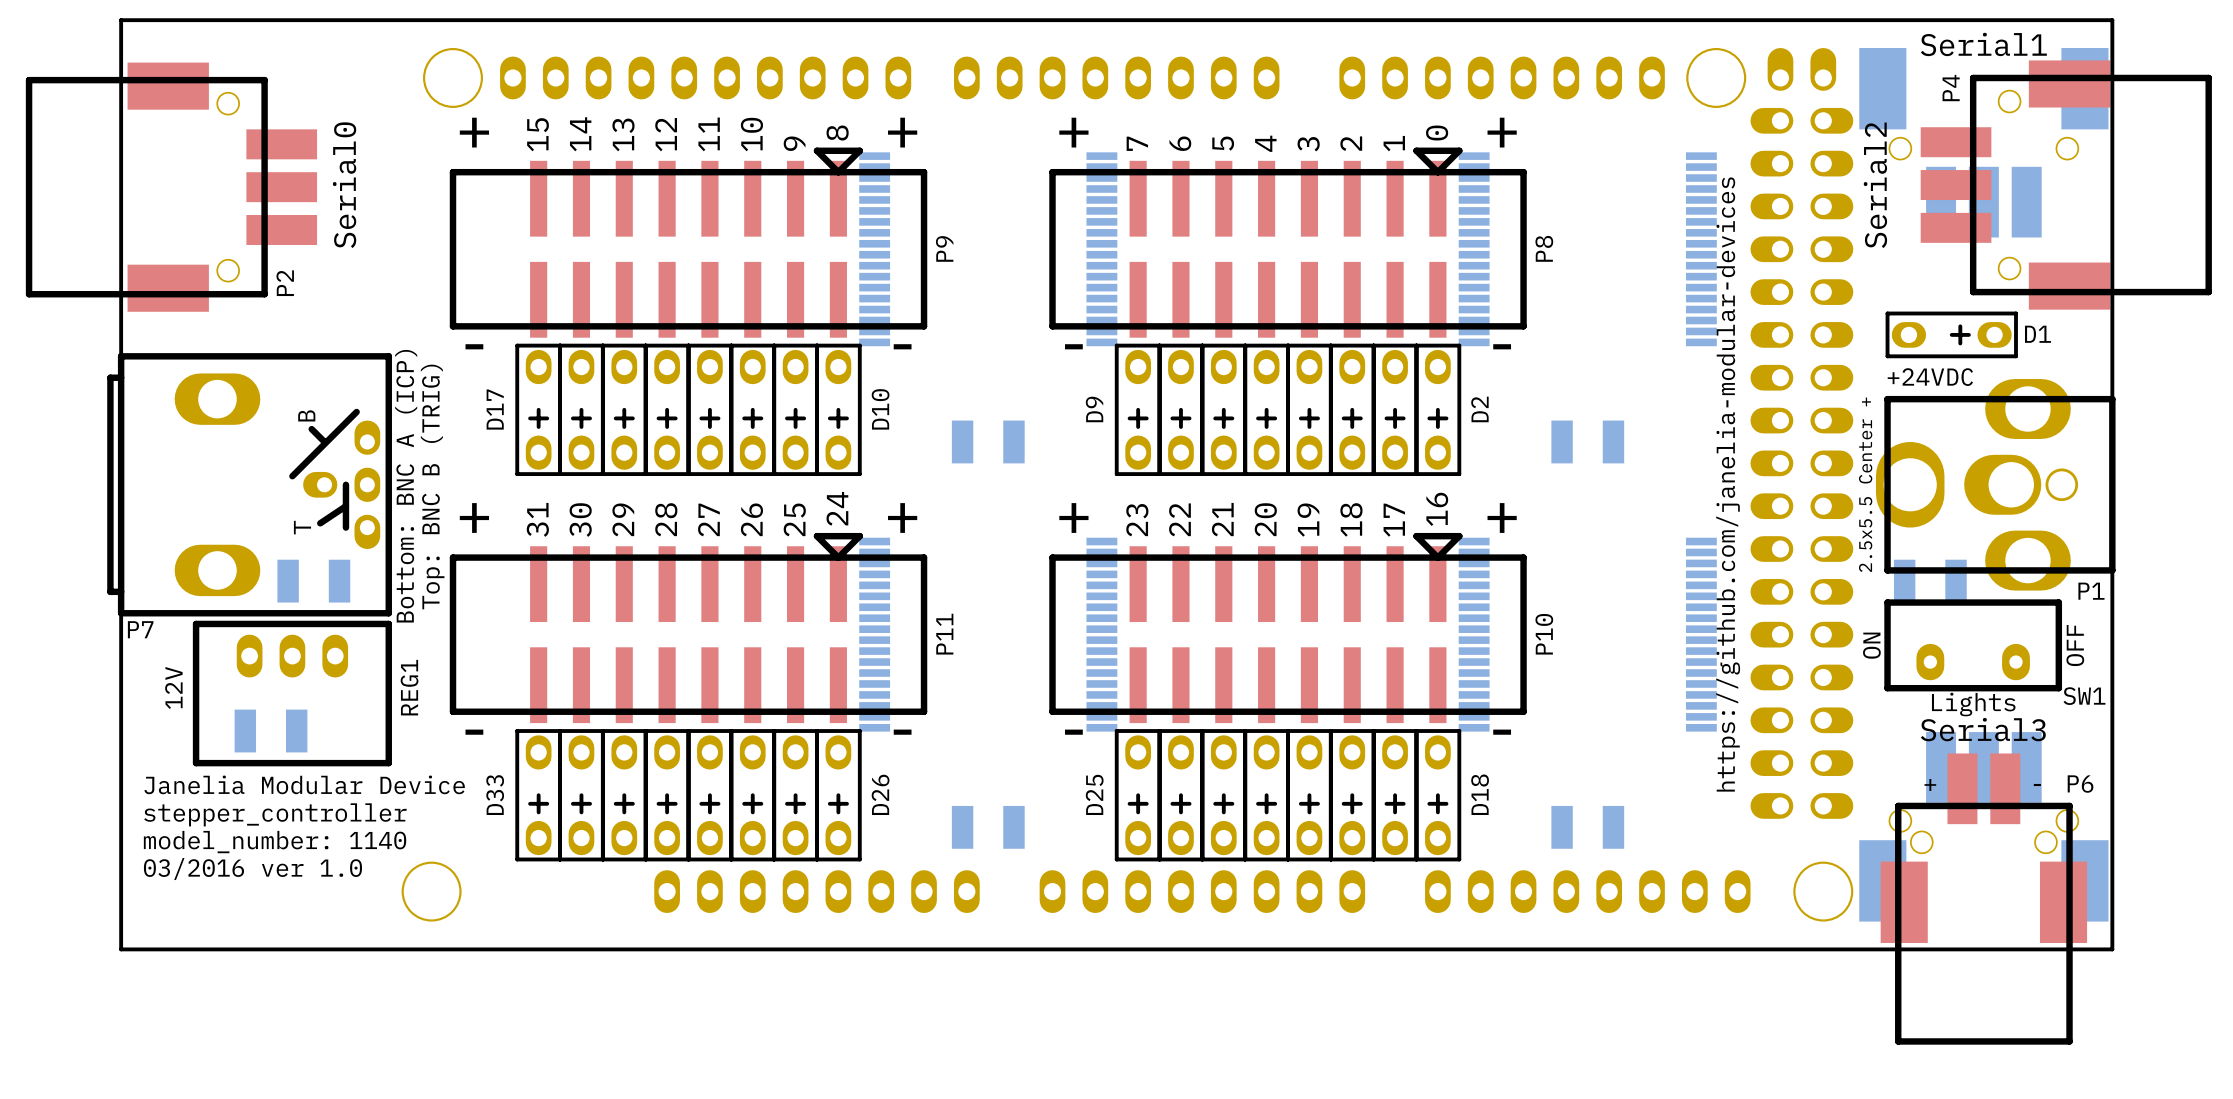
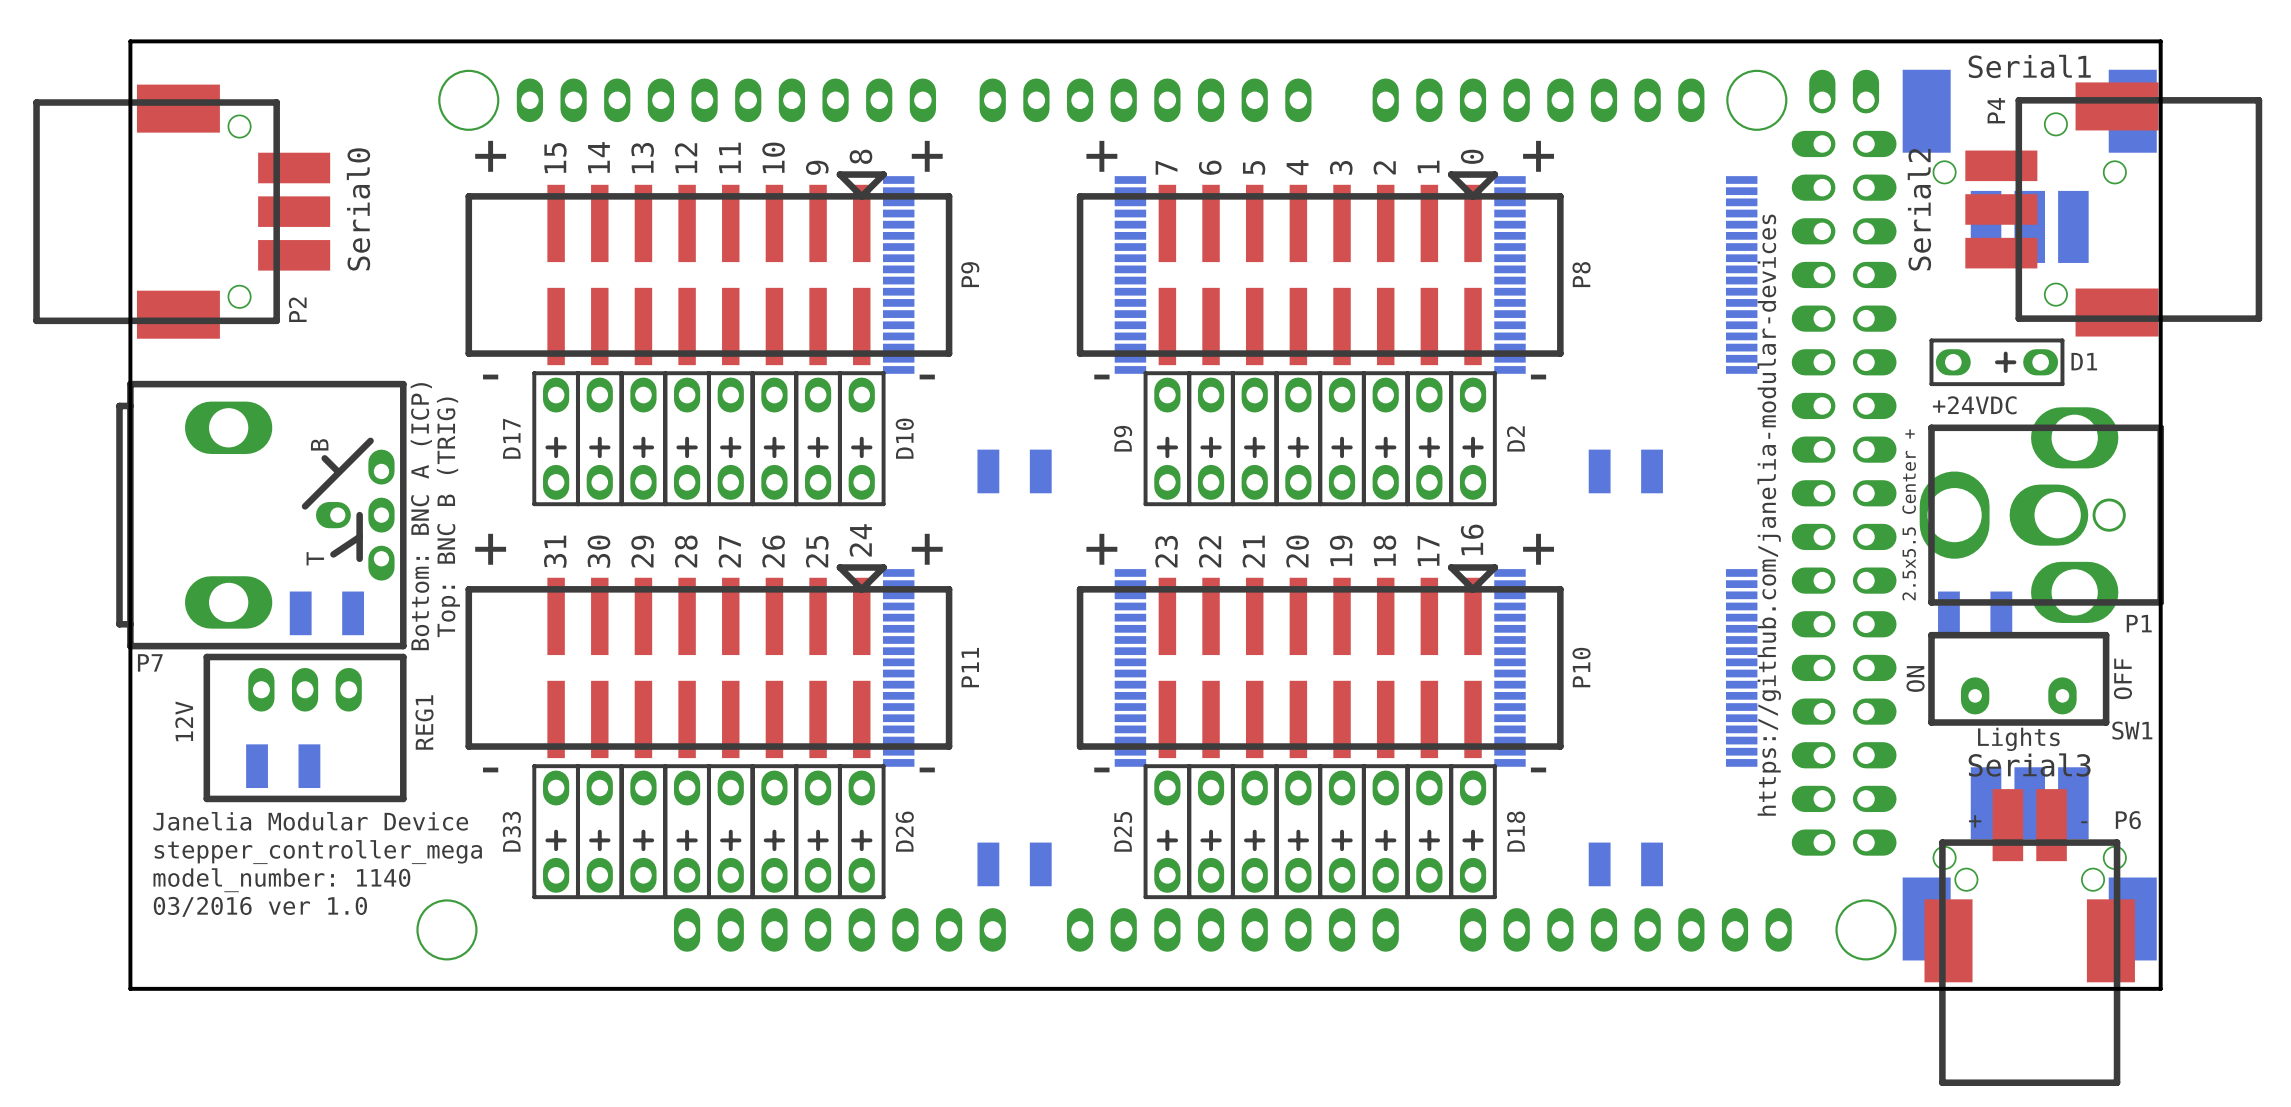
text: stepper_controller (275, 814) -> stepper_controller_mega (318, 852)

